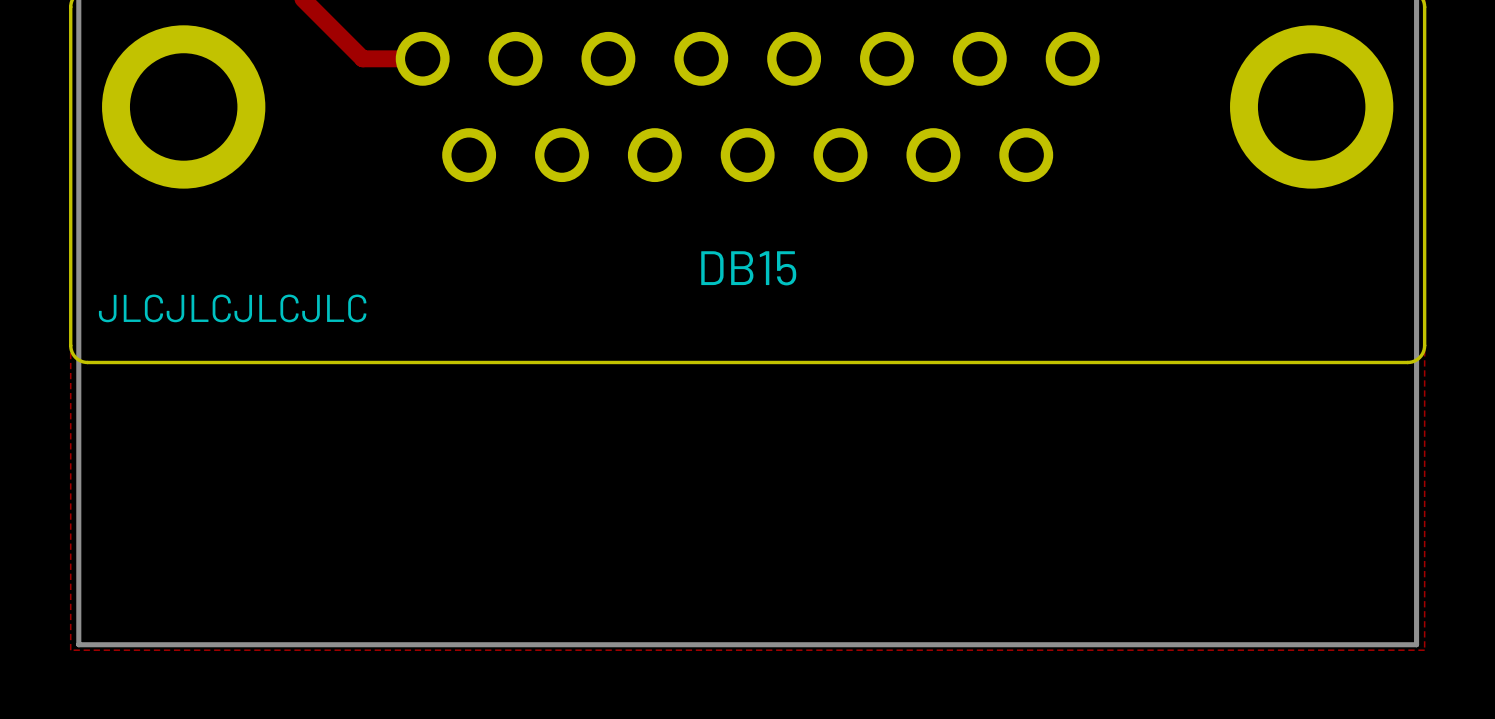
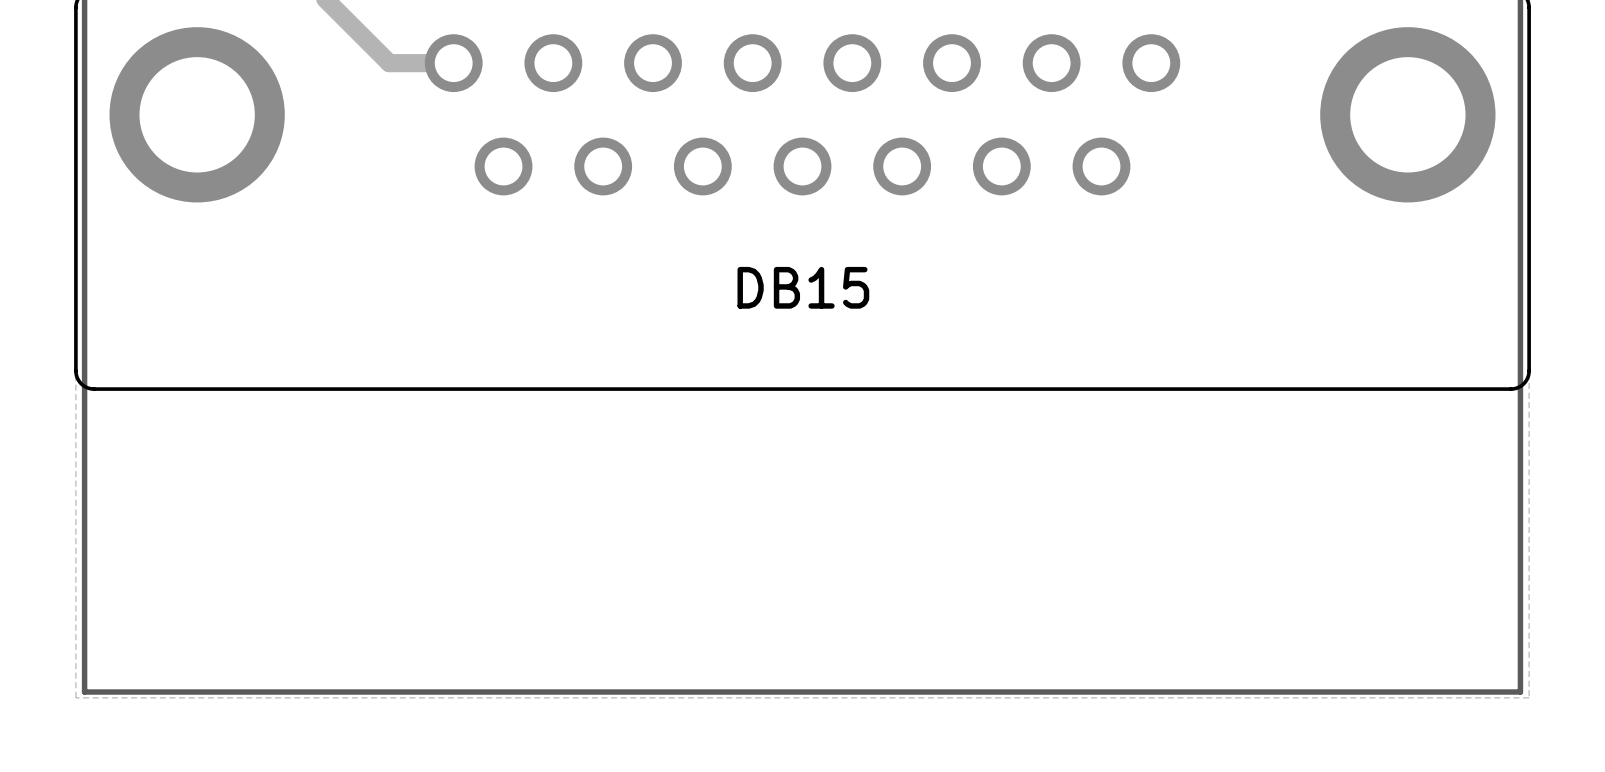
text: JLCJLCJLCJLC (232, 308) -> none

